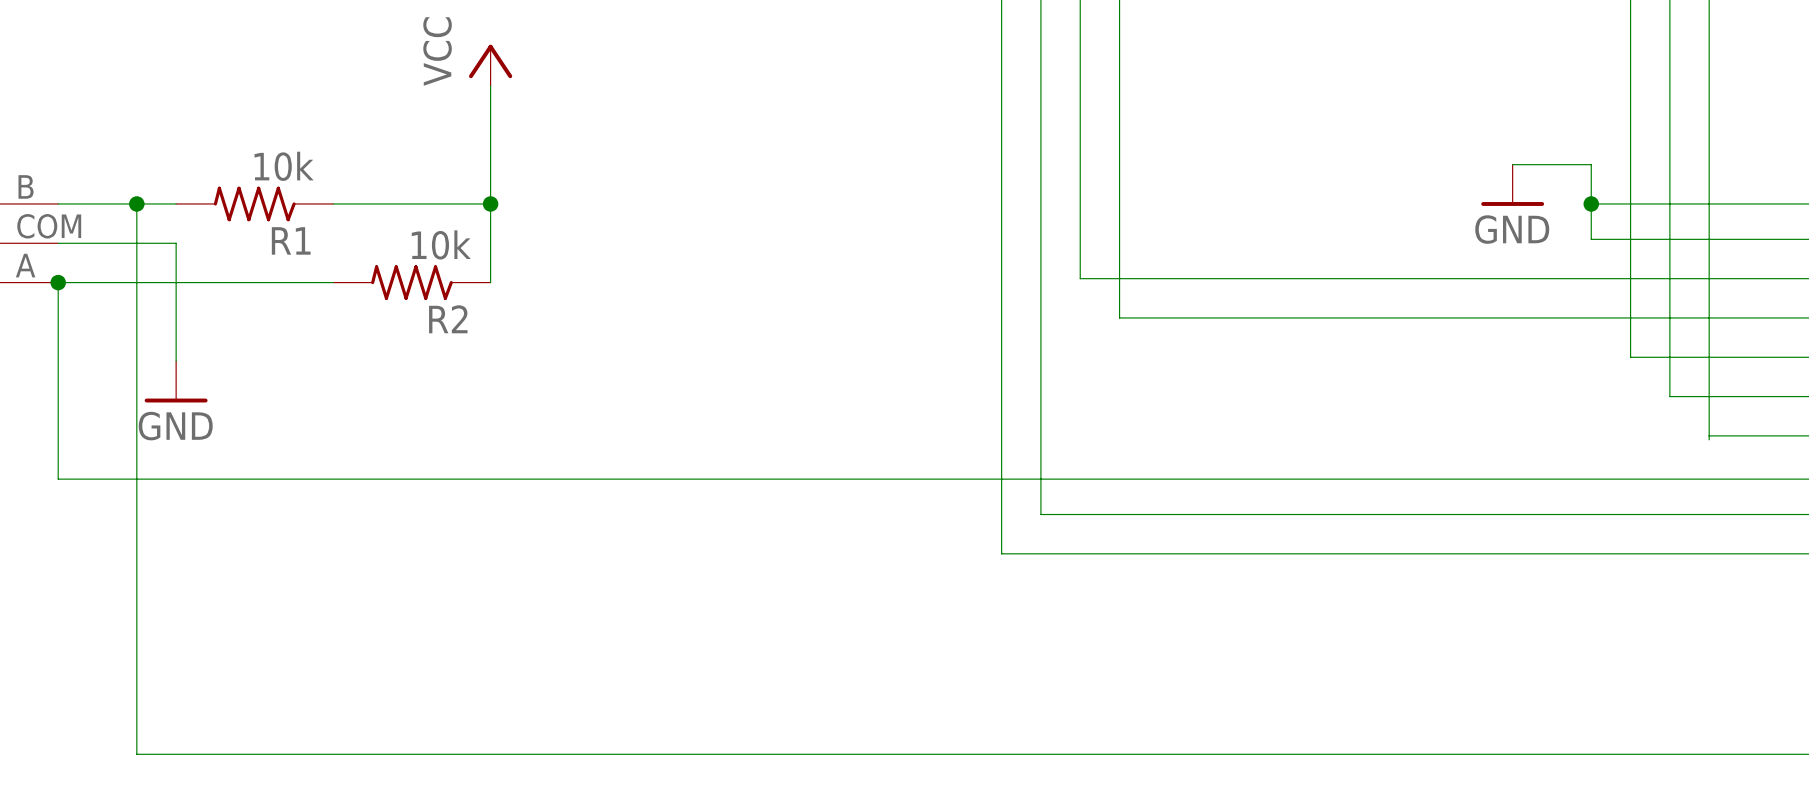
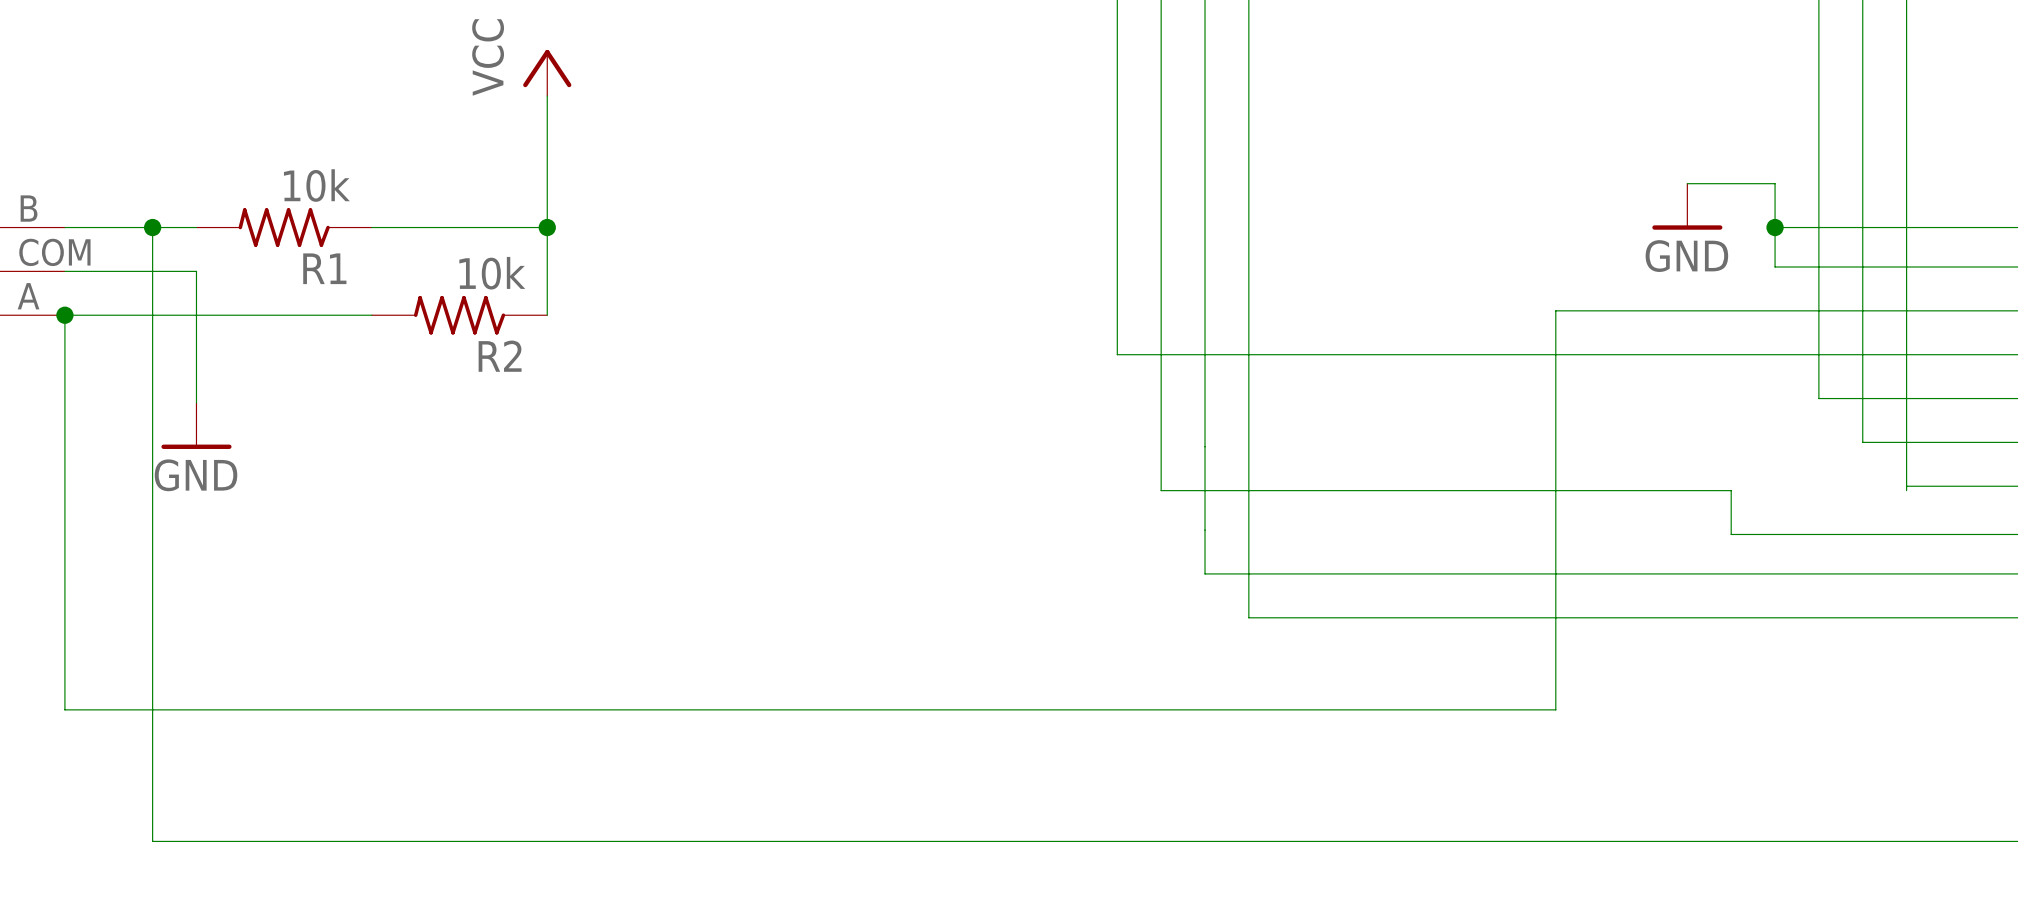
wire: (1080, 278) (1394, 278) -> none
wire: (1001, 317) (1001, 553) (1119, 553) -> (1117, 354) (1248, 354) (1248, 617)
wire: (1040, 439) (1040, 514) (1080, 514) -> (1205, 310) (1205, 573)
wire: none -> (1161, 490) (1731, 490) (1731, 534)
wire: (58, 479) (1551, 479) -> (64, 534) (64, 709) (1555, 709) (1555, 310)

